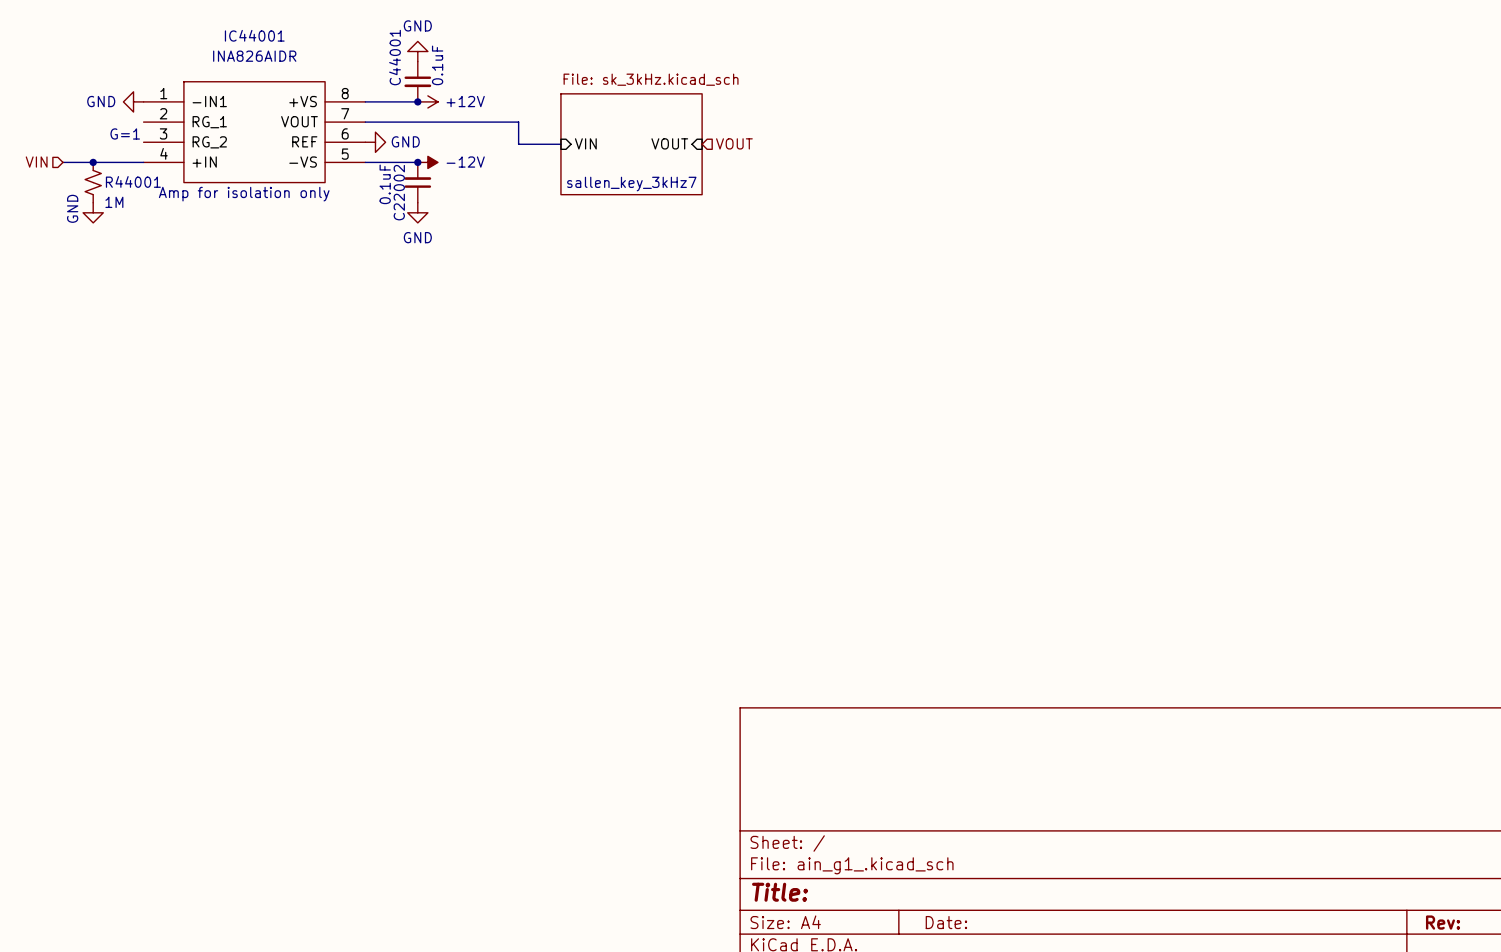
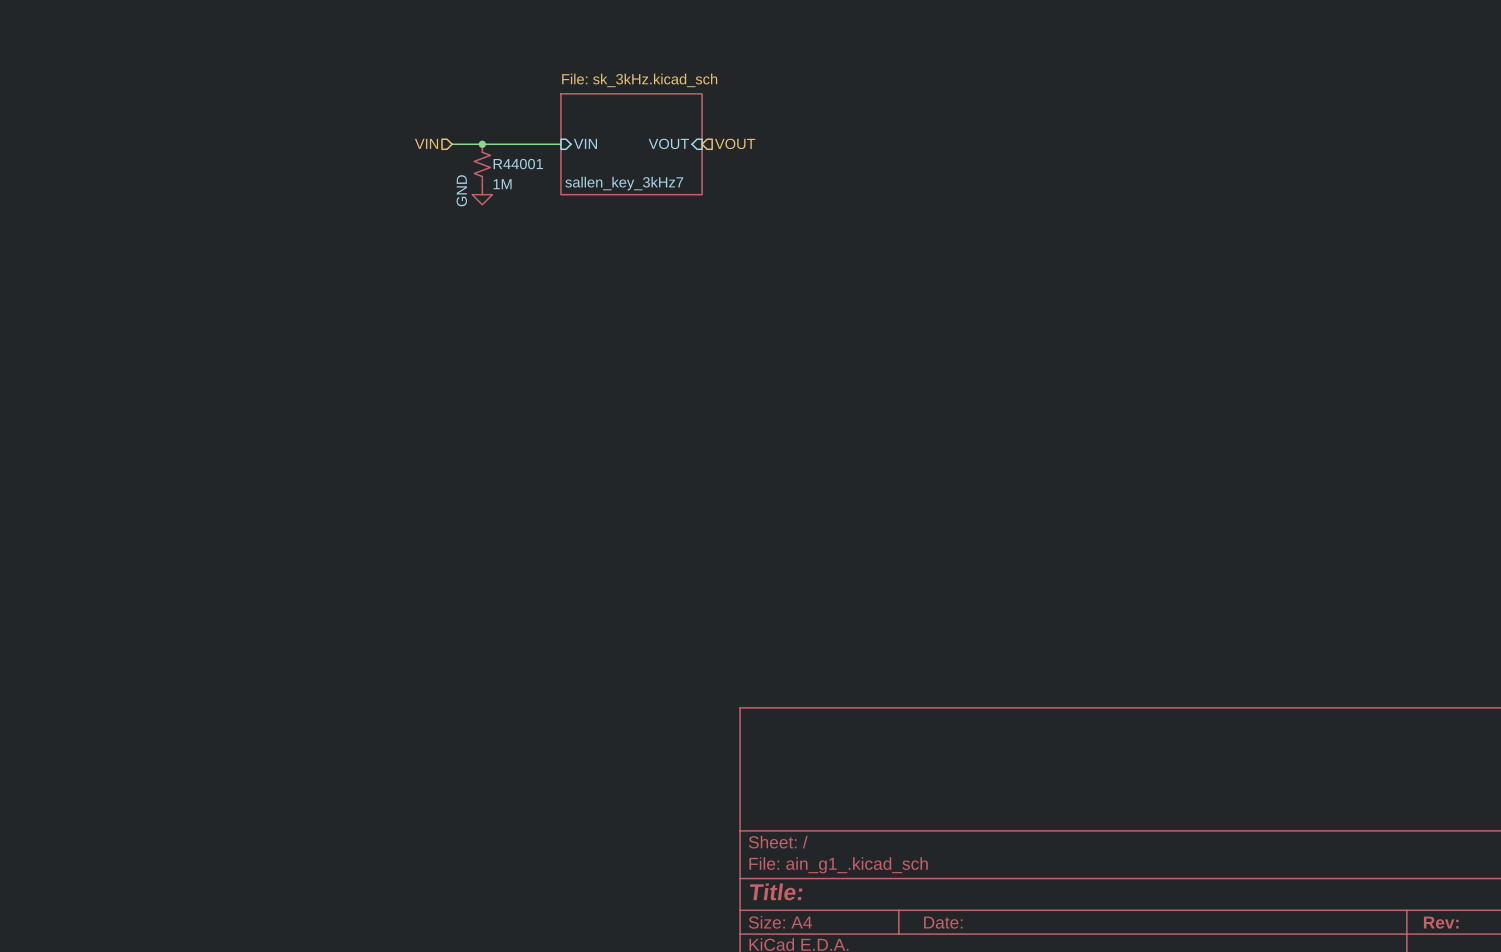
power symbol: GND (417, 51) -> none
C44001: 0.1uF (417, 81) -> none
power symbol: GND (133, 101) -> none
wire: (365, 101) (417, 101) -> none
junction: (417, 101) -> none
power symbol: +12V (427, 101) -> none
wire: (365, 122) (518, 122) (518, 144) -> (452, 144) (518, 144)
IC44001: INA826AIDR (254, 132) -> none
text: G=1 (125, 133) -> none
power symbol: GND (375, 142) -> none
hierarchical label: none -> VIN (426, 143)
junction: none -> (482, 144)
hierarchical label: VIN (36, 162) -> none
wire: (62, 162) (143, 162) -> none
junction: (93, 162) -> none
wire: (365, 162) (417, 162) -> none
junction: (417, 162) -> none
power symbol: -12V (427, 162) -> none
R44001 position: (93, 182) -> (482, 164)
C22002: 0.1uF (417, 182) -> none
text: Amp for isolation only (244, 194) -> none
power symbol: none -> GND (482, 194)
power symbol: GND (93, 212) -> none
power symbol: GND (417, 212) -> none

